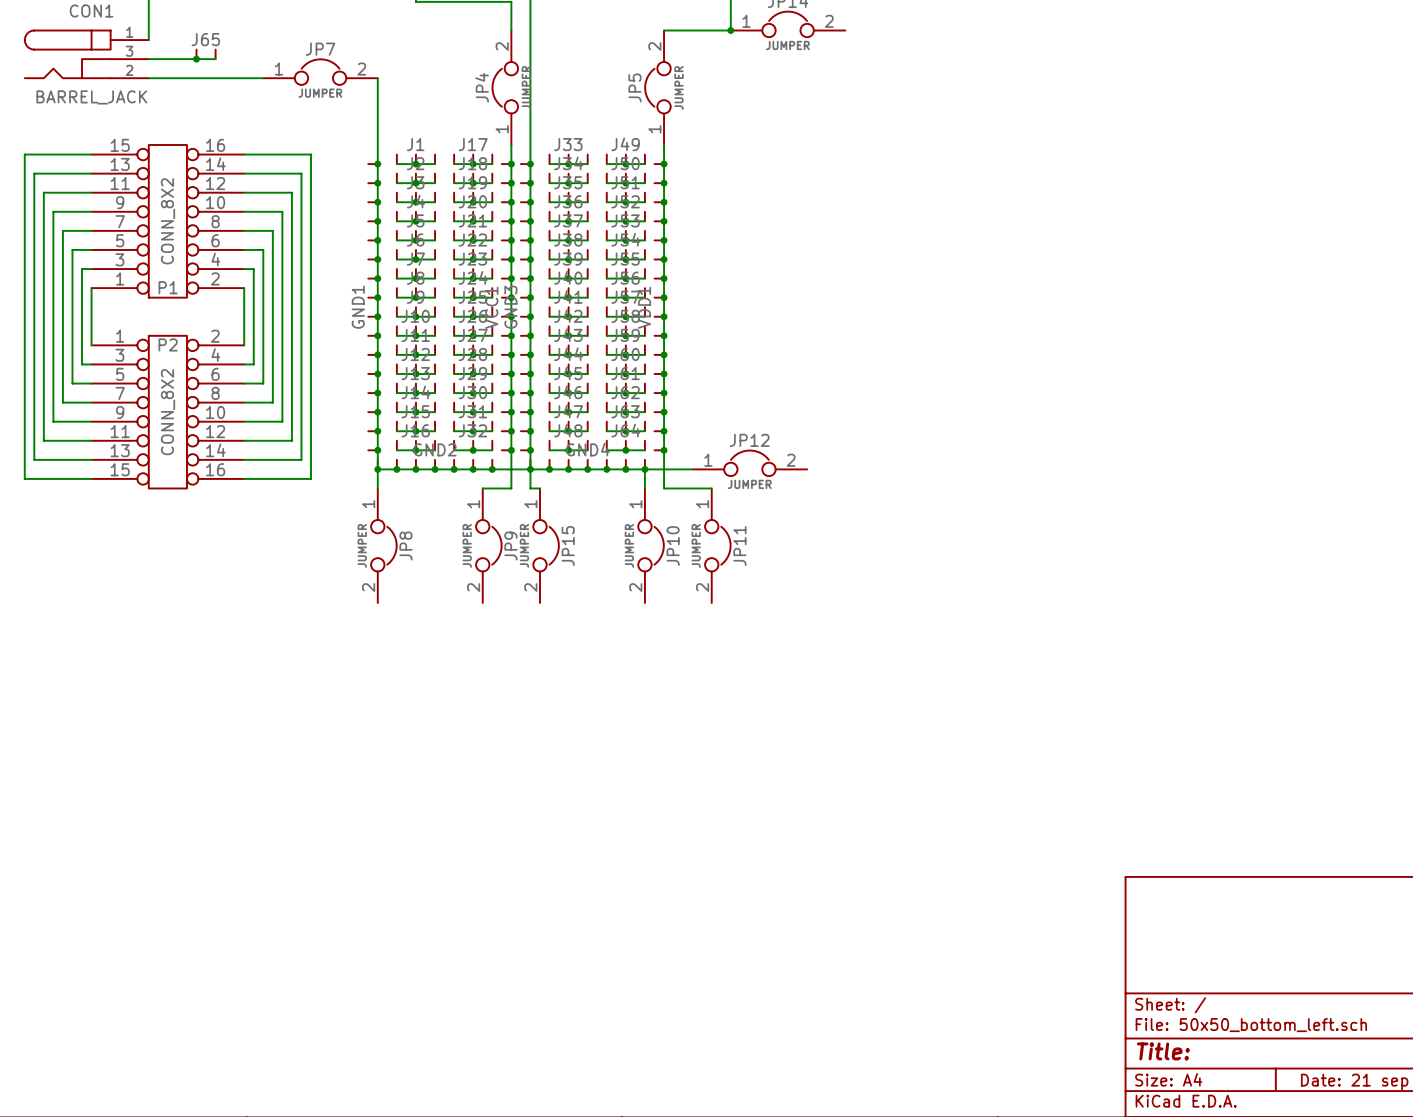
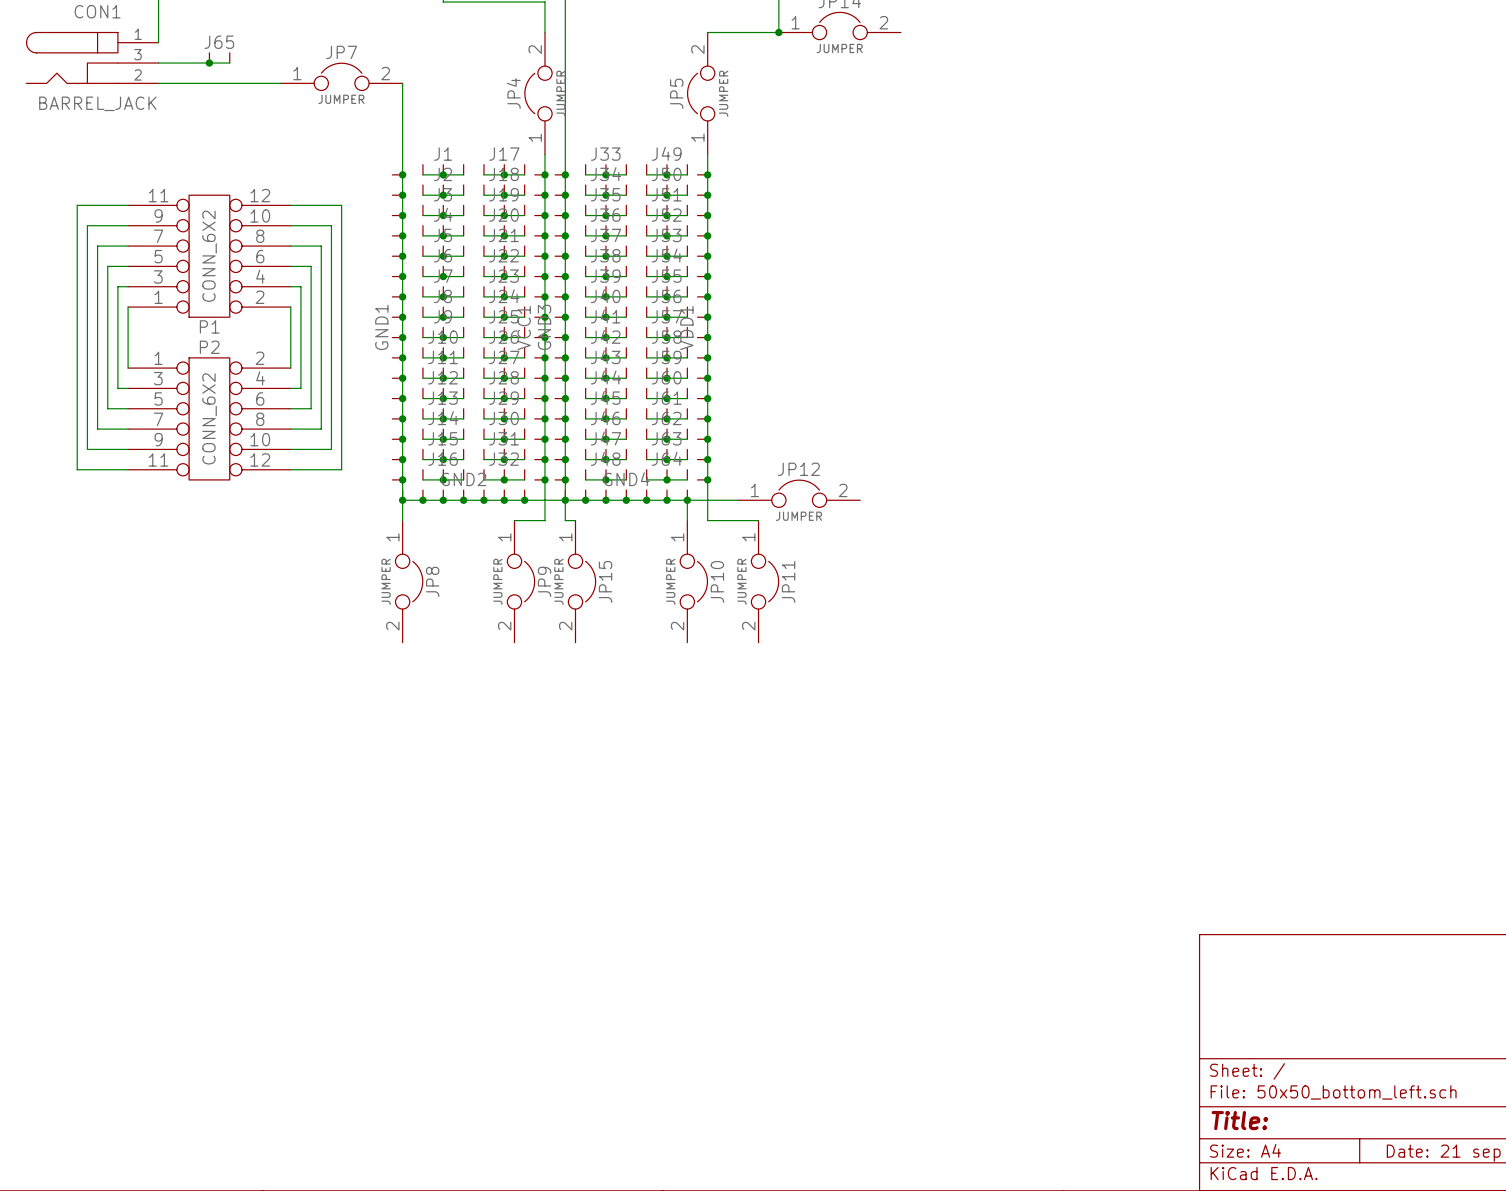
P1 symbol: [91, 145, 245, 298] -> [128, 195, 291, 318]
wire: (91, 154) (24, 154) (24, 478) (91, 478) -> none
wire: (244, 154) (311, 154) (311, 211) -> (300, 225) (331, 225)
wire: (91, 173) (34, 173) (34, 459) (91, 459) -> none
wire: (244, 173) (301, 173) (301, 230) -> (290, 246) (321, 246)
wire: (72, 192) (43, 192) (43, 440) (72, 440) -> none
wire: (291, 192) (291, 249) -> (290, 266) (311, 266)
wire: none -> (311, 205) (341, 205) (341, 469) (311, 469)
wire: (82, 211) (53, 211) (53, 421) (82, 421) -> none
wire: (282, 211) (282, 269) -> (290, 286) (300, 286)
P1 value: CONN_8X2 (168, 221) -> CONN_6X2 (209, 256)
wire: (91, 230) (62, 230) (62, 402) (91, 402) -> none
wire: none -> (128, 246) (97, 246) (97, 307)
wire: (244, 230) (272, 230) (272, 288) -> none
wire: (72, 249) (91, 249) -> (77, 266) (77, 205)
wire: none -> (128, 266) (107, 266) (107, 408) (128, 408)
wire: (244, 249) (263, 249) (263, 383) (244, 383) -> none
wire: (82, 269) (91, 269) -> (87, 286) (87, 225)
wire: none -> (128, 286) (117, 286) (117, 388) (128, 388)
wire: (244, 269) (253, 269) (253, 364) (244, 364) -> none
wire: (244, 288) (244, 345) -> (128, 307) (128, 368)
P2 symbol: [91, 335, 245, 489] -> [128, 357, 291, 480]
wire: none -> (97, 368) (97, 429) (128, 429)
wire: (272, 345) (272, 402) (244, 402) -> none
wire: (82, 364) (91, 364) -> (87, 388) (87, 449)
wire: (282, 364) (282, 421) -> (300, 388) (290, 388)
wire: (72, 383) (91, 383) -> (77, 408) (77, 469)
wire: (291, 383) (291, 440) -> (311, 408) (290, 408)
wire: (301, 402) (301, 459) (244, 459) -> (321, 429) (290, 429)
P2 value: CONN_8X2 (168, 412) -> CONN_6X2 (209, 418)
wire: (311, 421) (311, 478) (244, 478) -> (331, 449) (300, 449)

